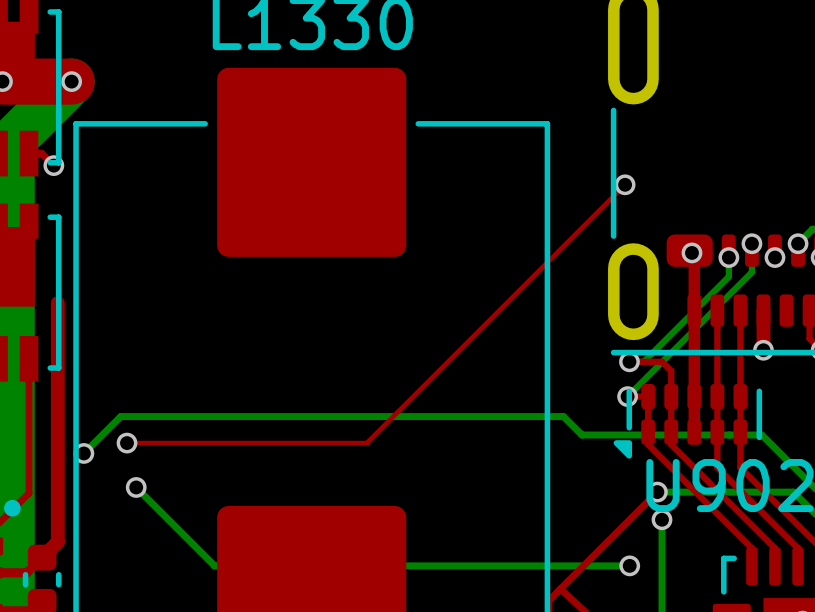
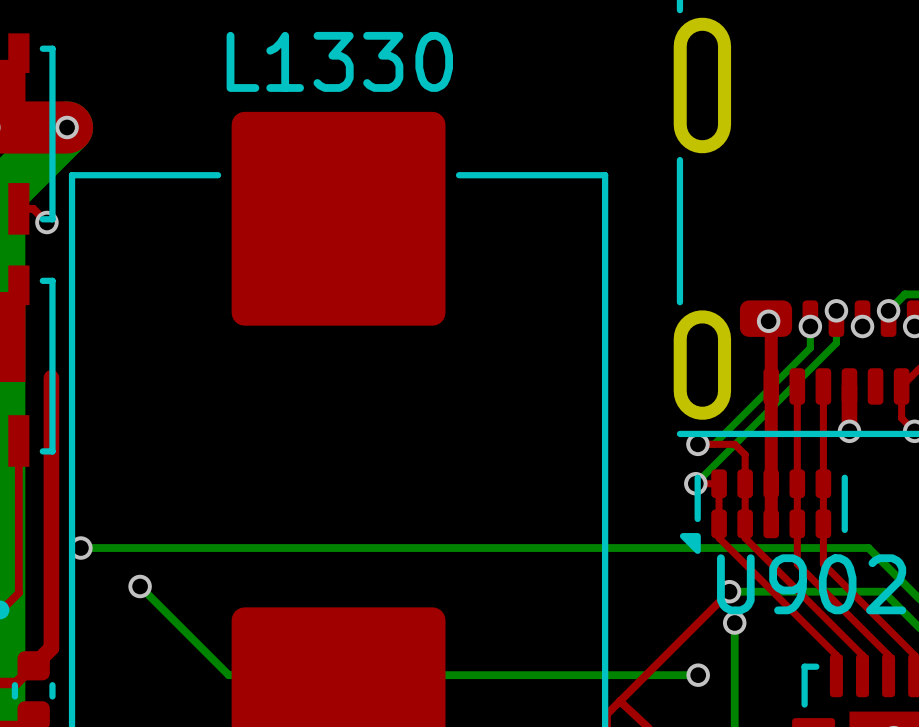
top track: (625, 184) (366, 443) (127, 443) -> none
via: (625, 184) -> none
via: (127, 443) -> none
bottom track: (83, 453) (120, 416) (563, 416) (581, 435) (761, 435) (780, 453) -> (80, 548) (868, 548)

